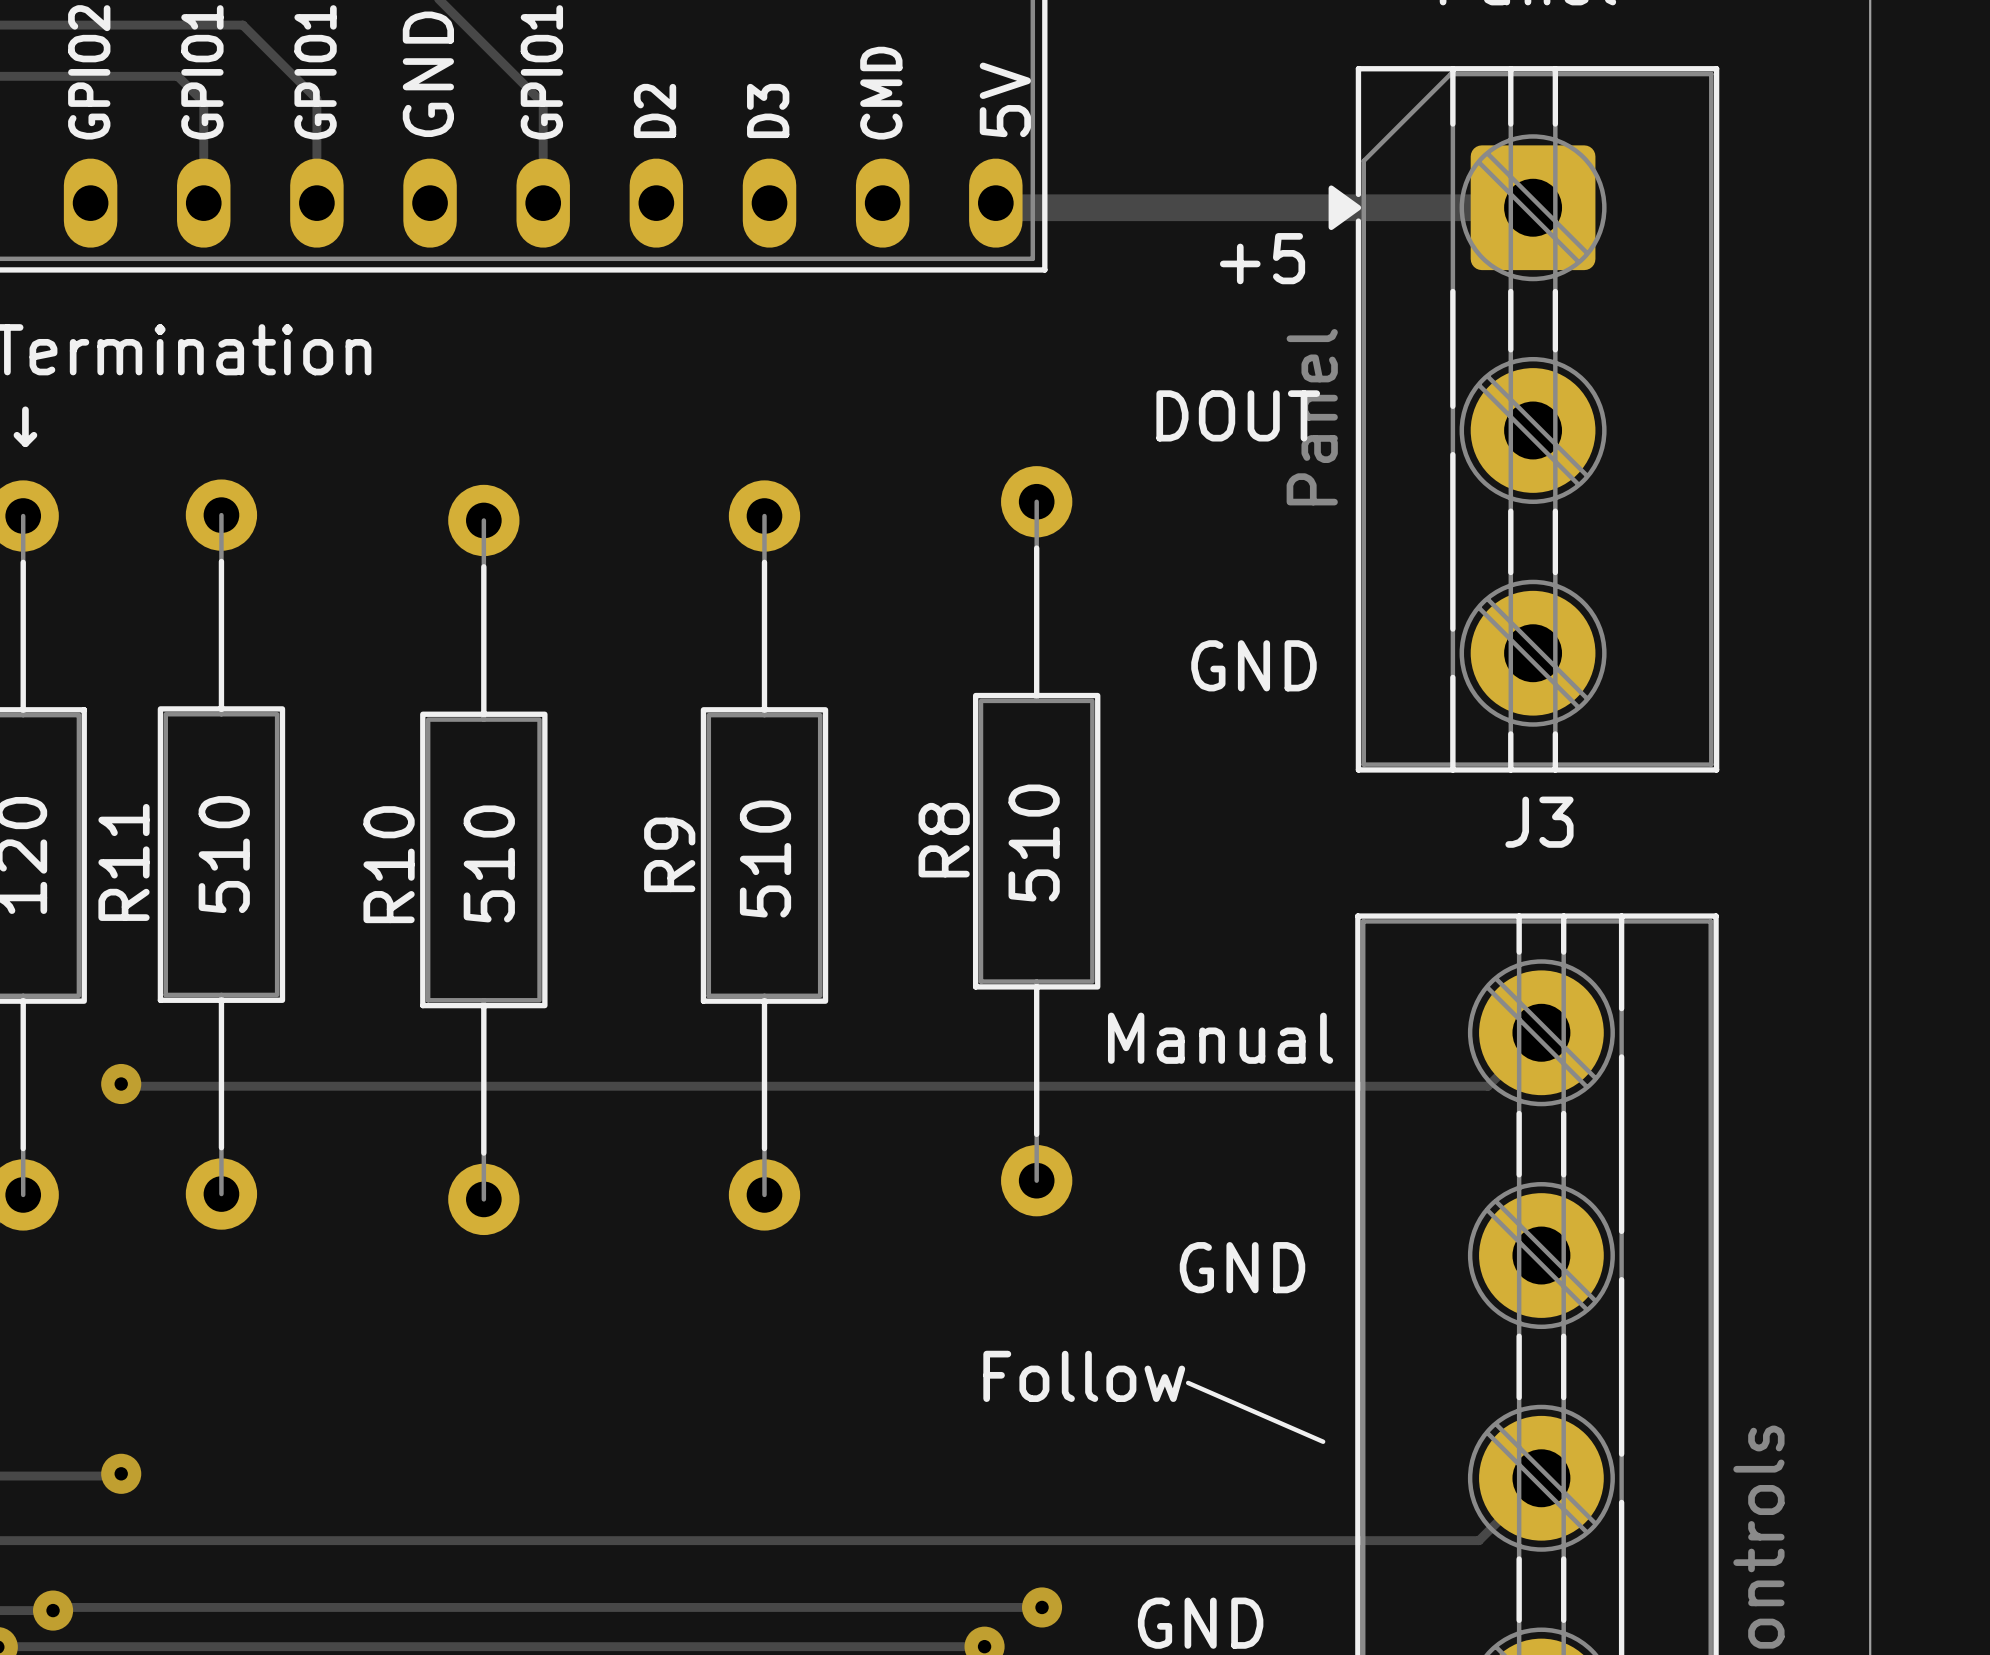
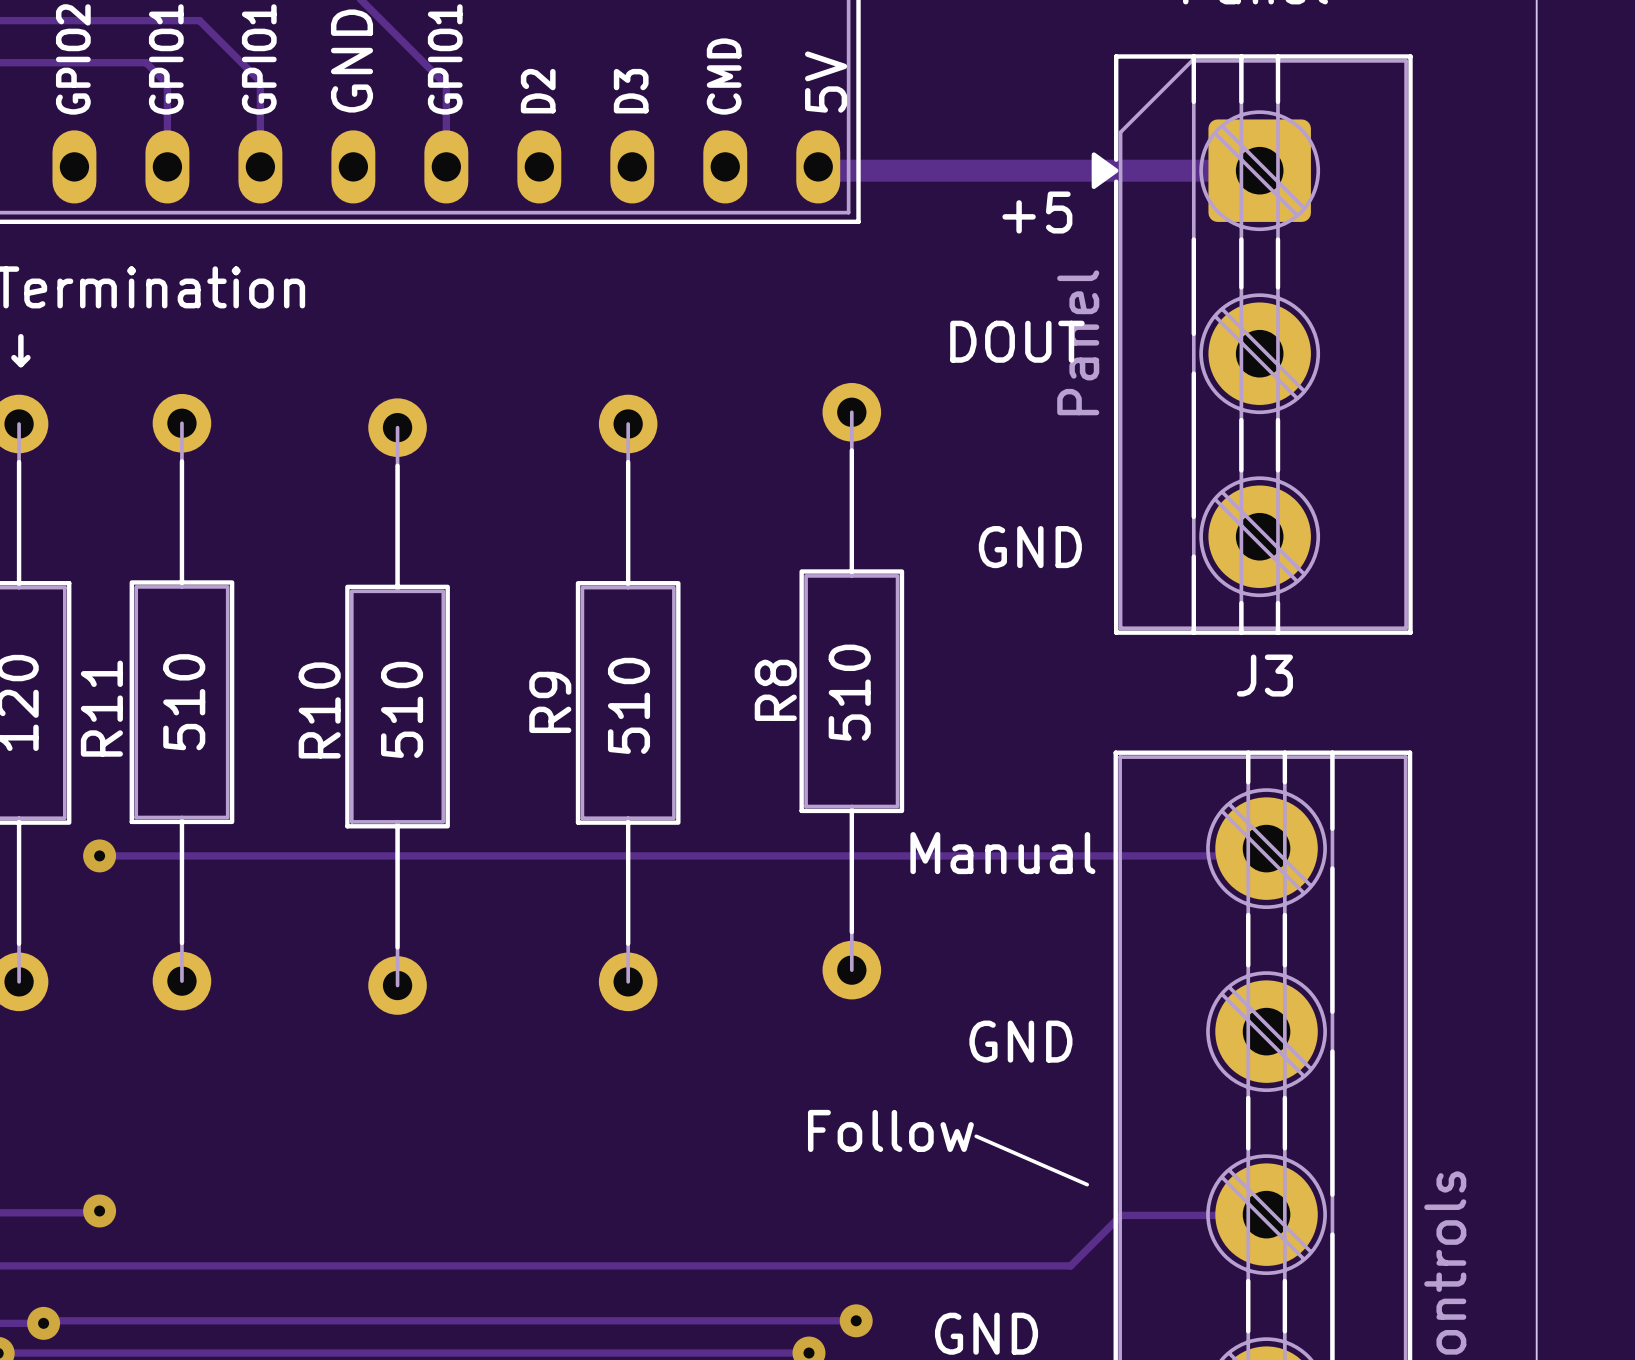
track: (1541, 1032) (1487, 1086) (123, 1086) (121, 1084) -> none
track: none -> (99, 855) (1259, 855)
via position: (121, 1084) -> (99, 855)
track: (1541, 1478) (1479, 1540) (1303, 1540) -> (1265, 1215) (1121, 1215) (1070, 1265)

